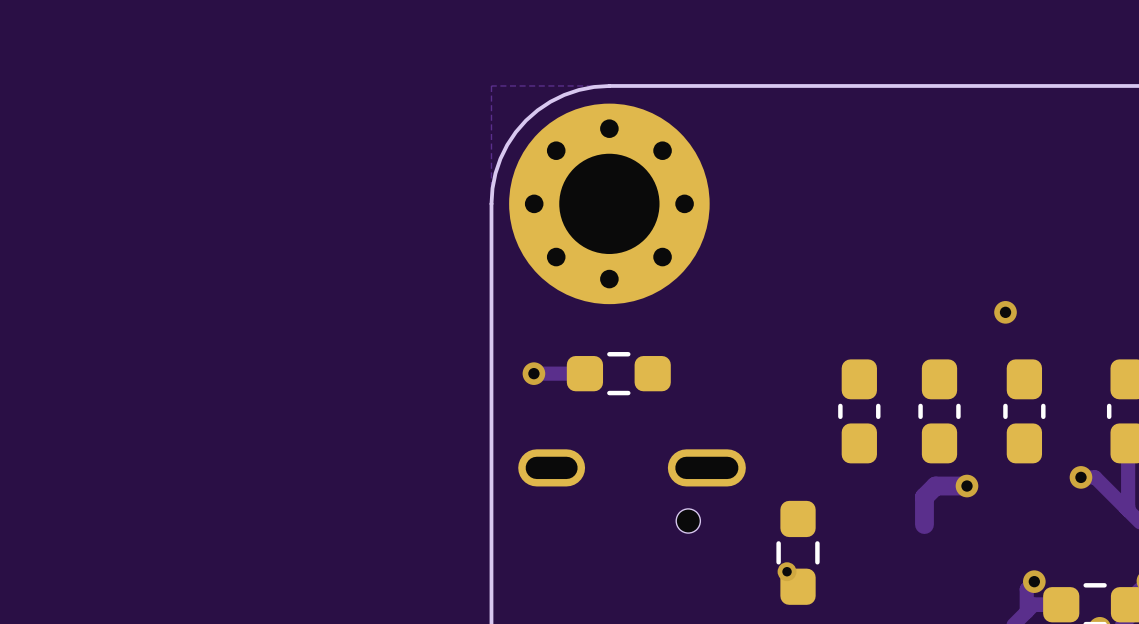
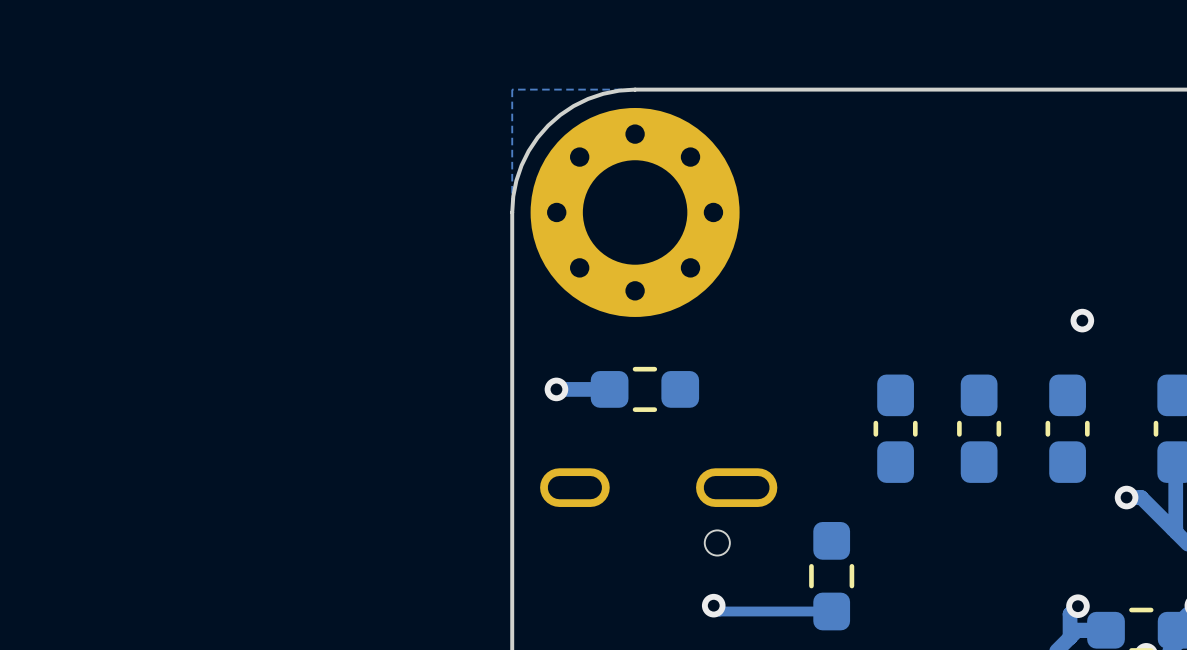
via position: (1005, 312) -> (1082, 320)
track: (966, 486) (935, 486) (924, 497) (924, 524) -> none
via: (966, 486) -> none
via: (787, 571) -> none
track: none -> (713, 605) (719, 611) (831, 611)
via: none -> (713, 605)

